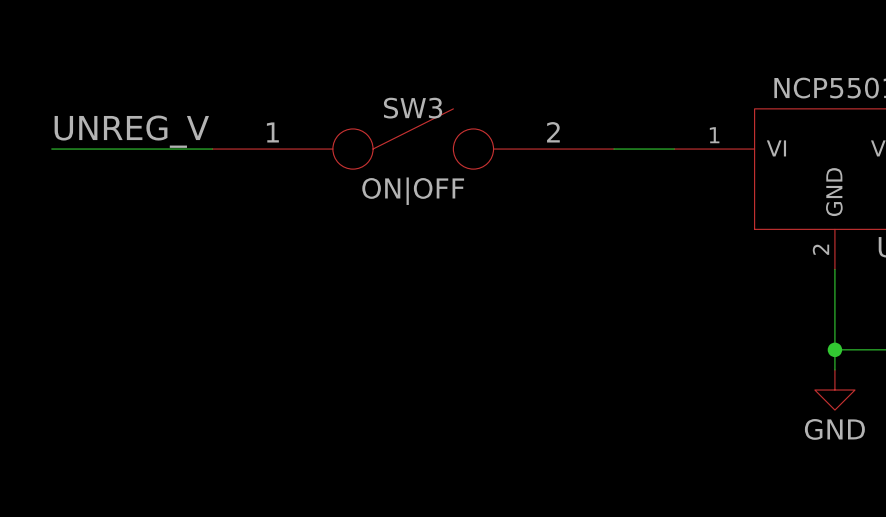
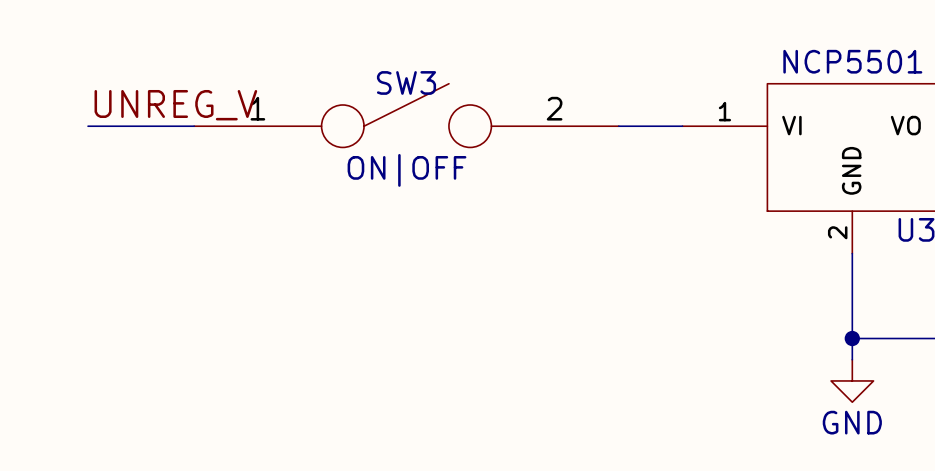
label position: UNREG_V (131, 131) -> UNREG_V (175, 105)
wire: (51, 149) (111, 149) -> none

